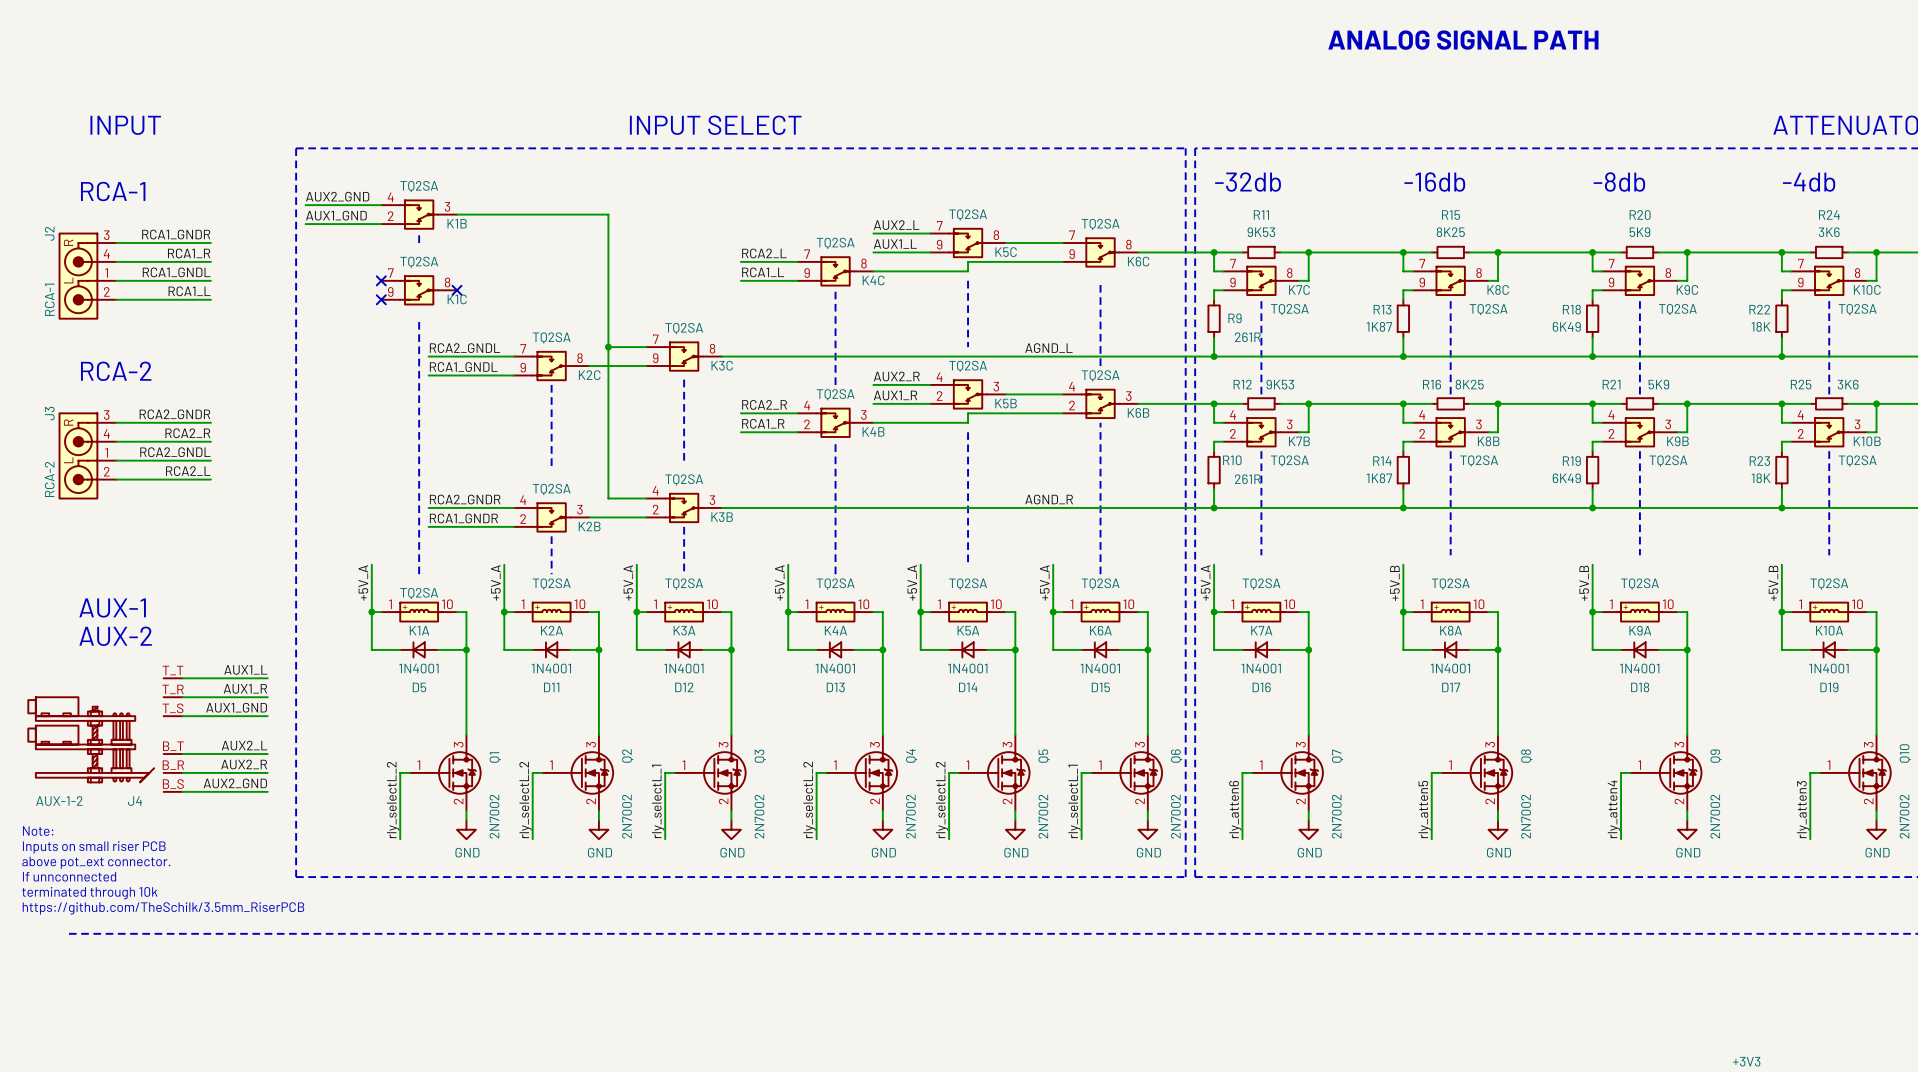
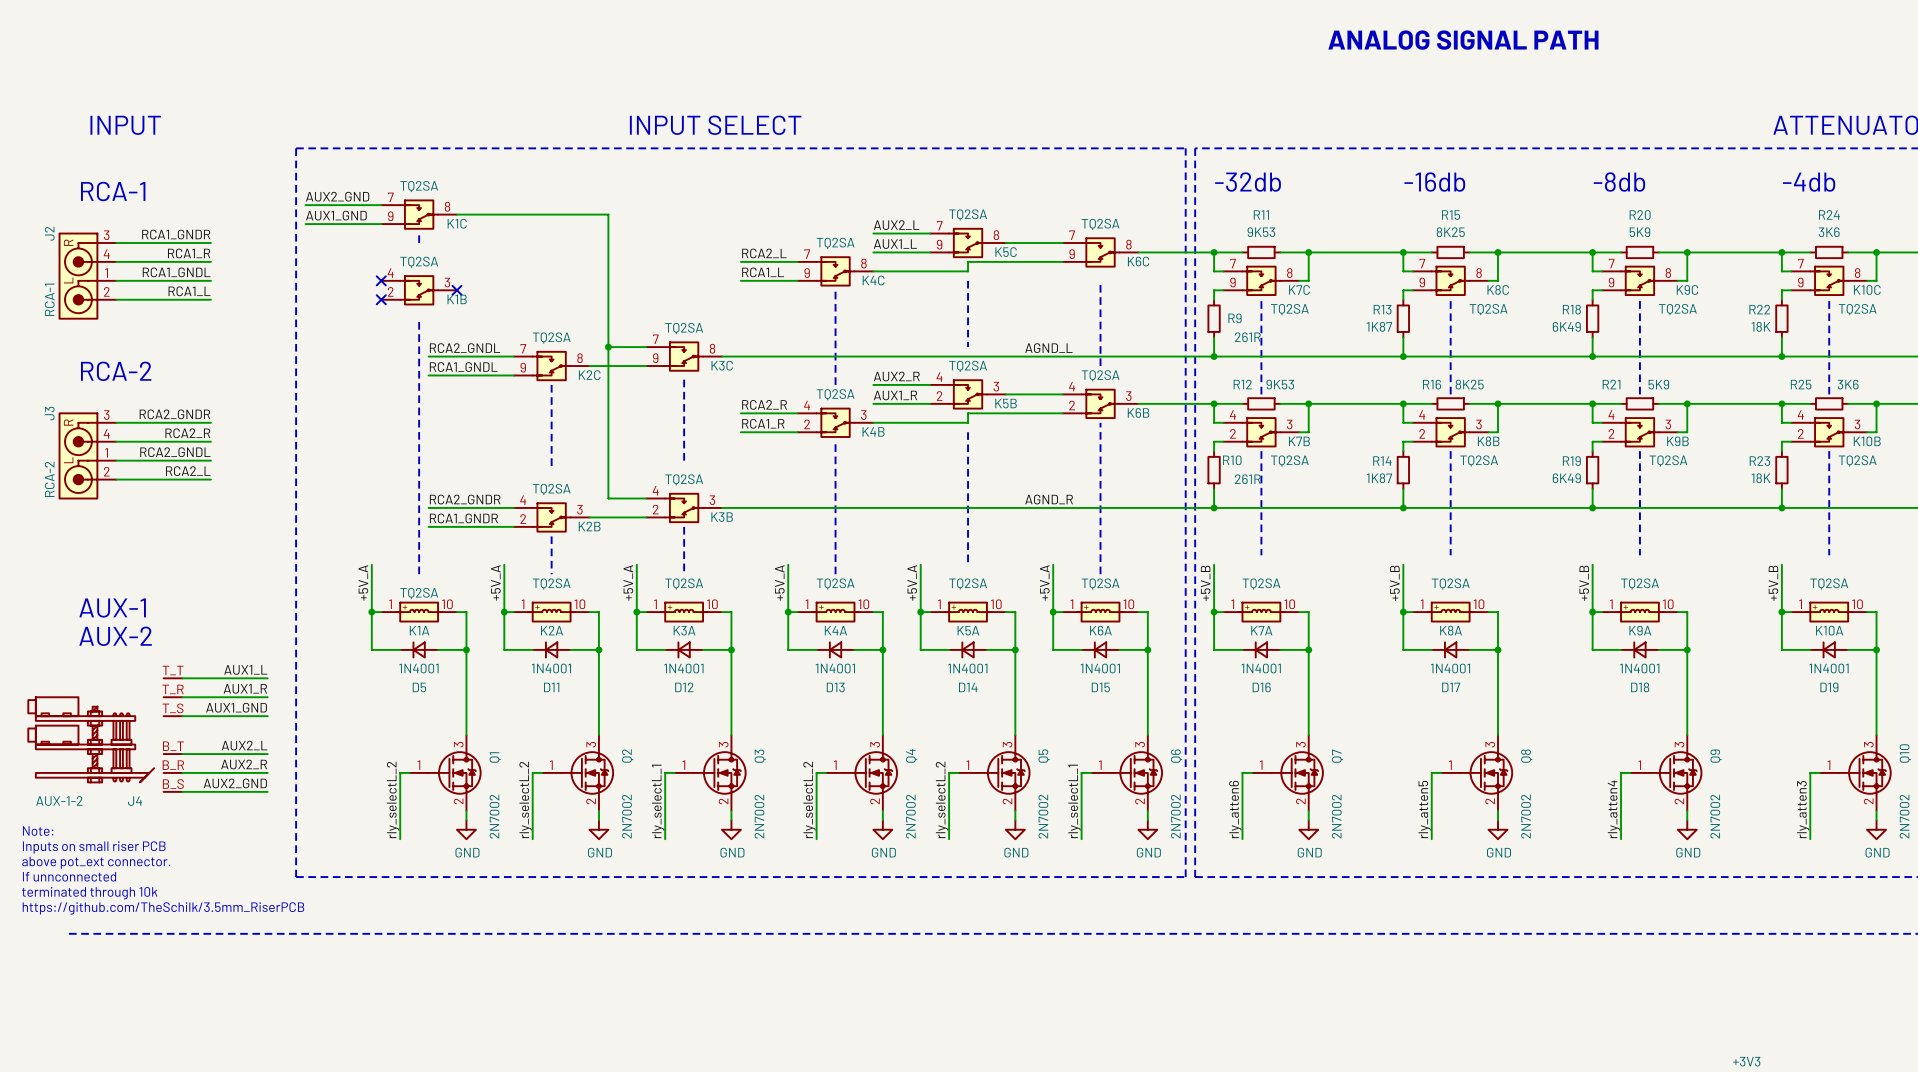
K1B position: (419, 214) -> (419, 290)
K1C position: (419, 290) -> (419, 214)
label: +5V_A (1205, 582) -> +5V_B (1205, 583)

